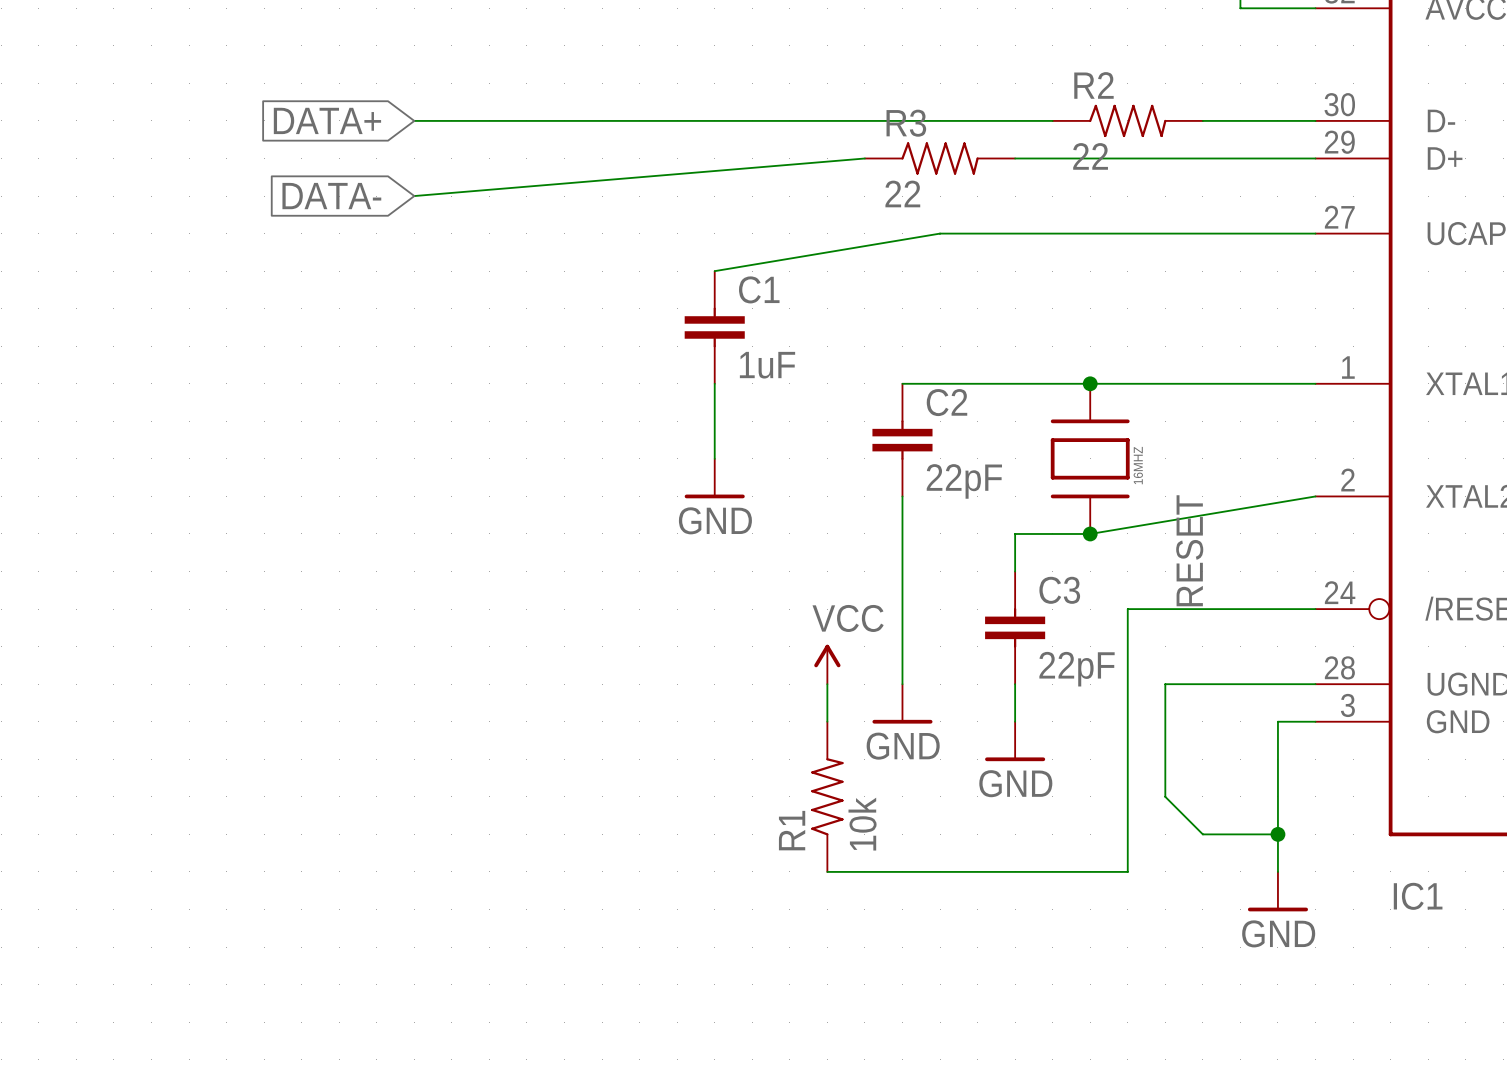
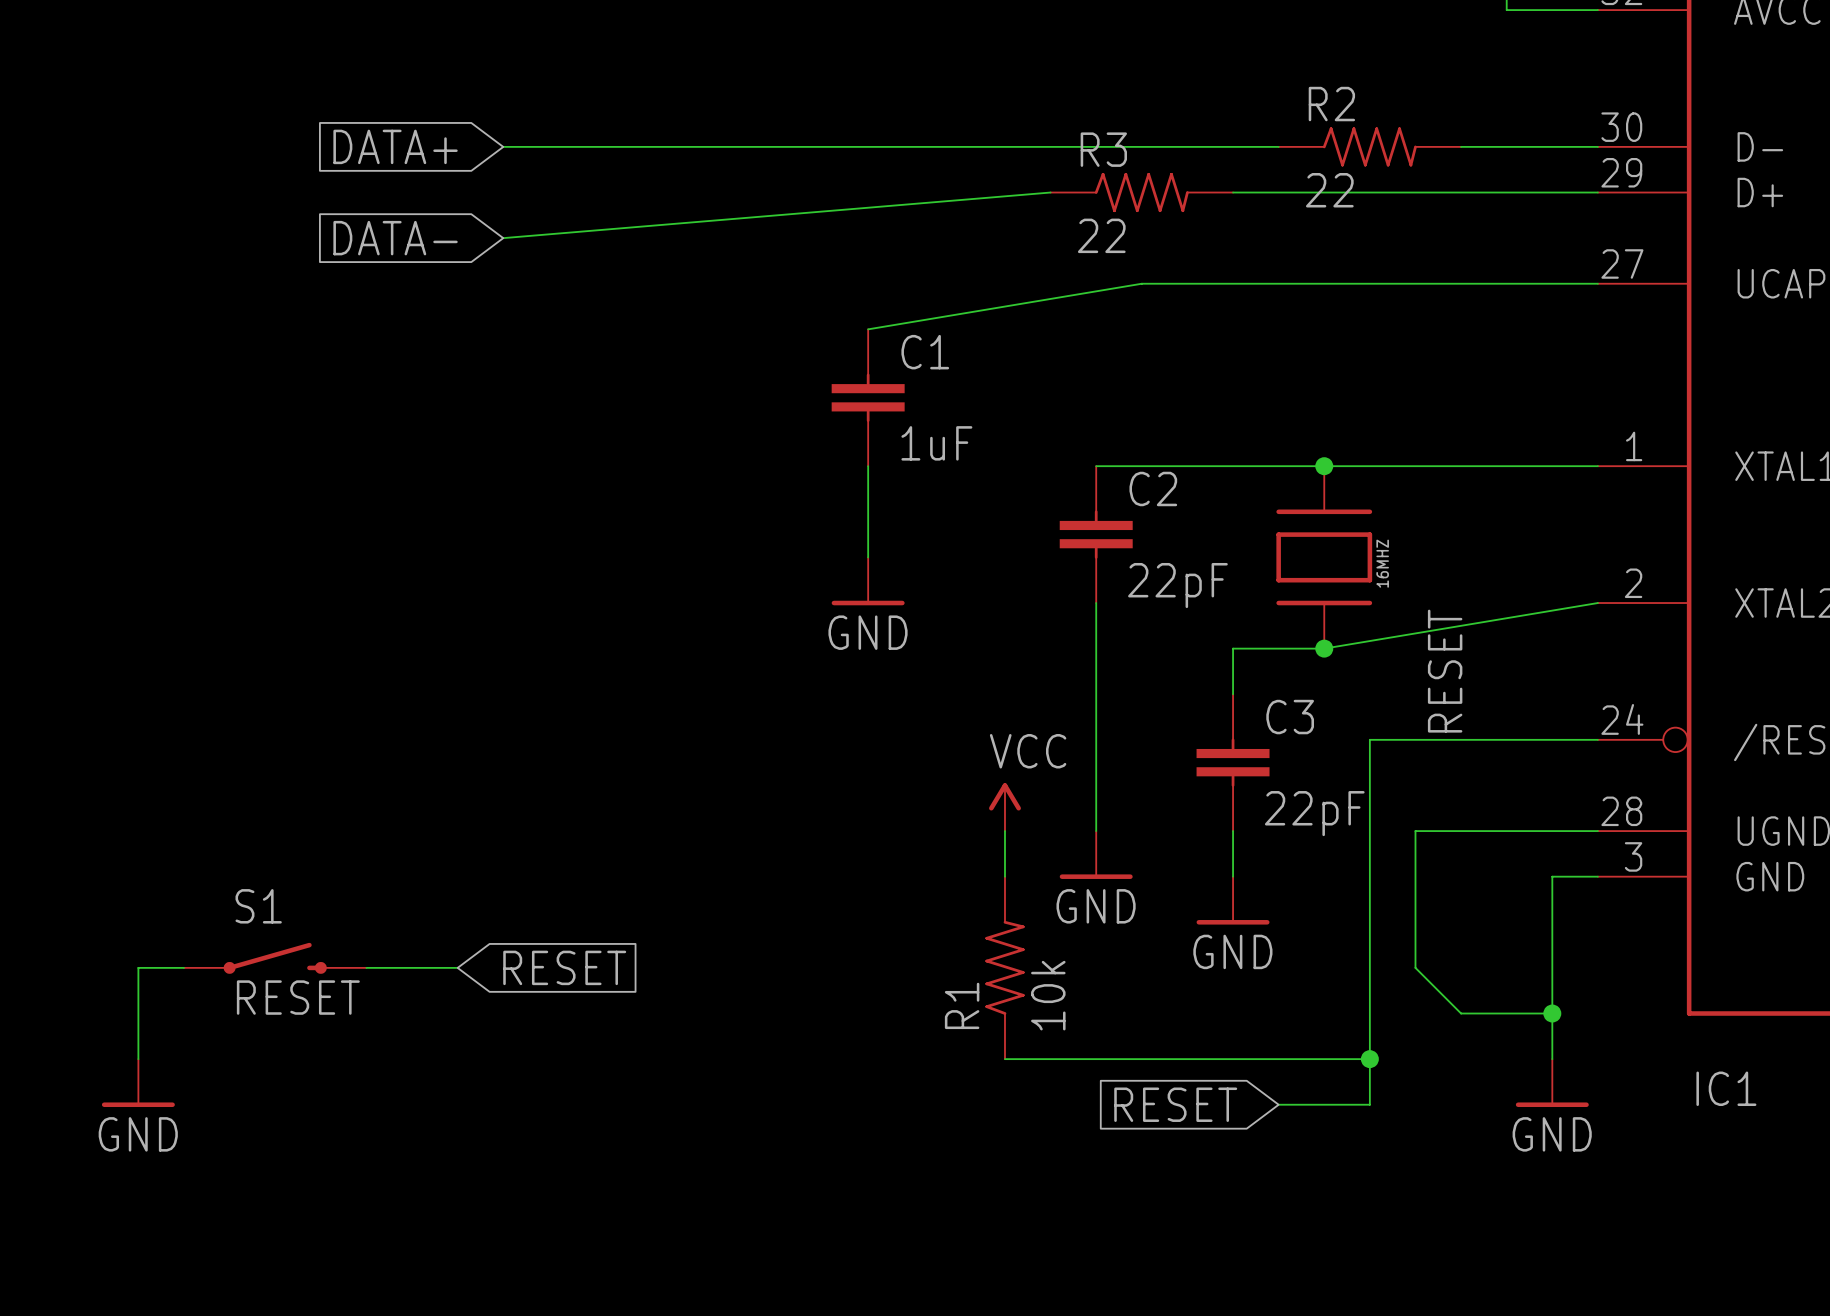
S1: none -> RESET (275, 958)
wire: none -> (184, 967) (138, 967) (138, 1059)
wire: none -> (366, 967) (457, 967)
global label: none -> RESET (564, 967)
wire: none -> (1369, 1059) (1369, 1104) (1278, 1104)
junction: none -> (1369, 1059)
power symbol: none -> GND (138, 1083)
global label: none -> RESET (1175, 1104)

